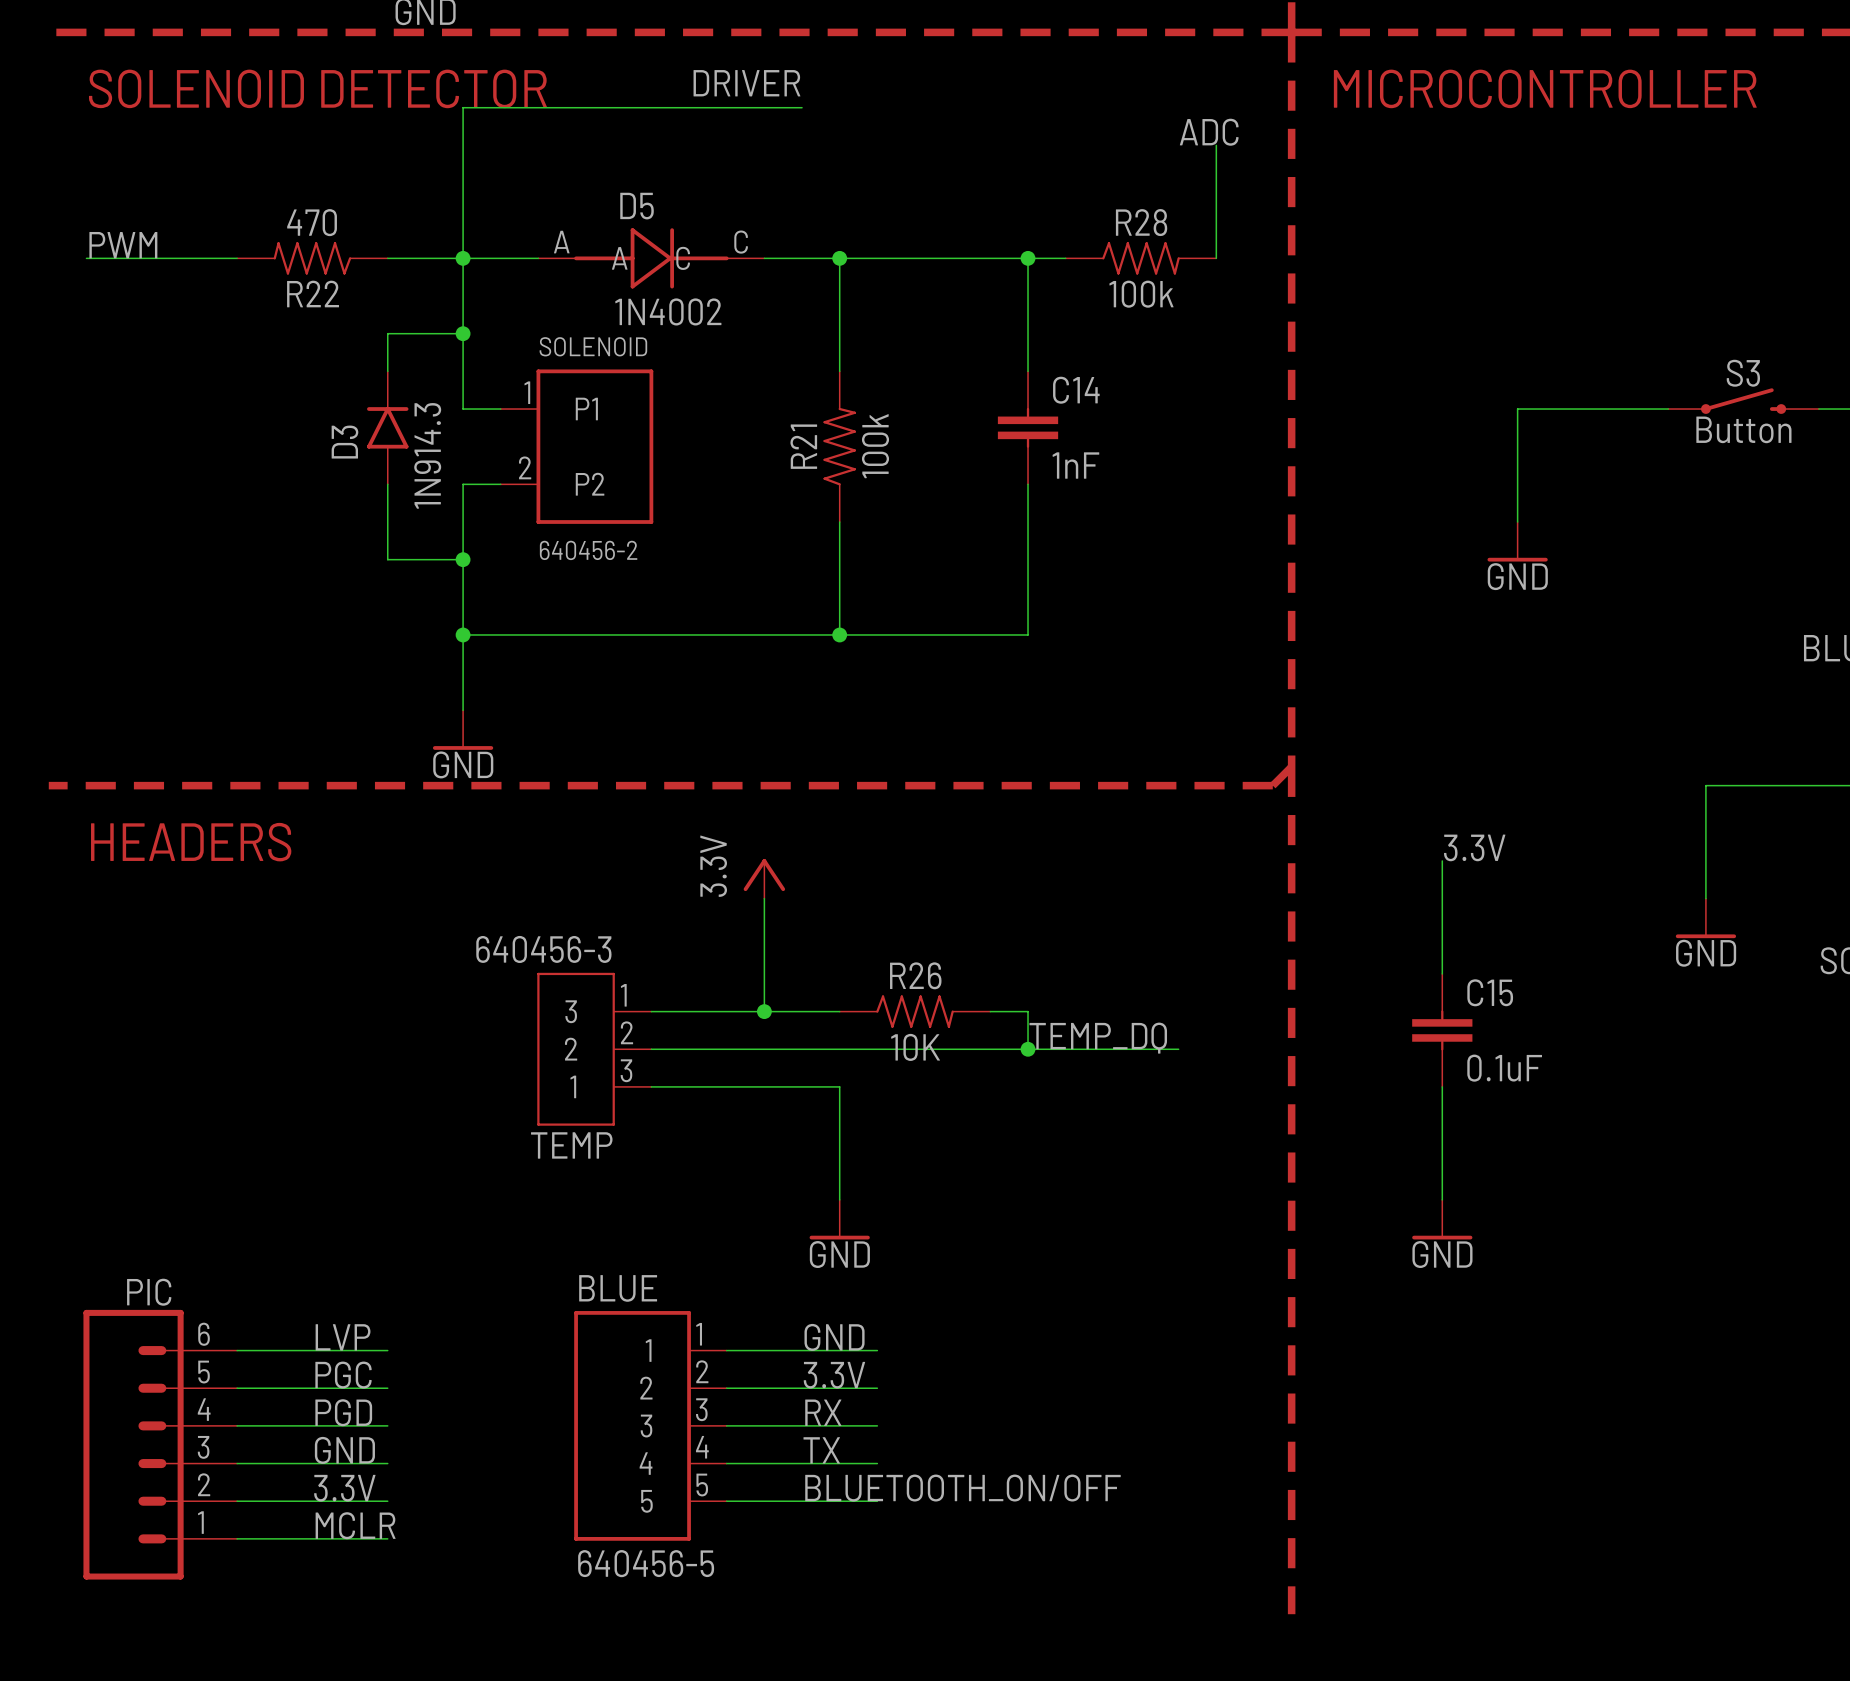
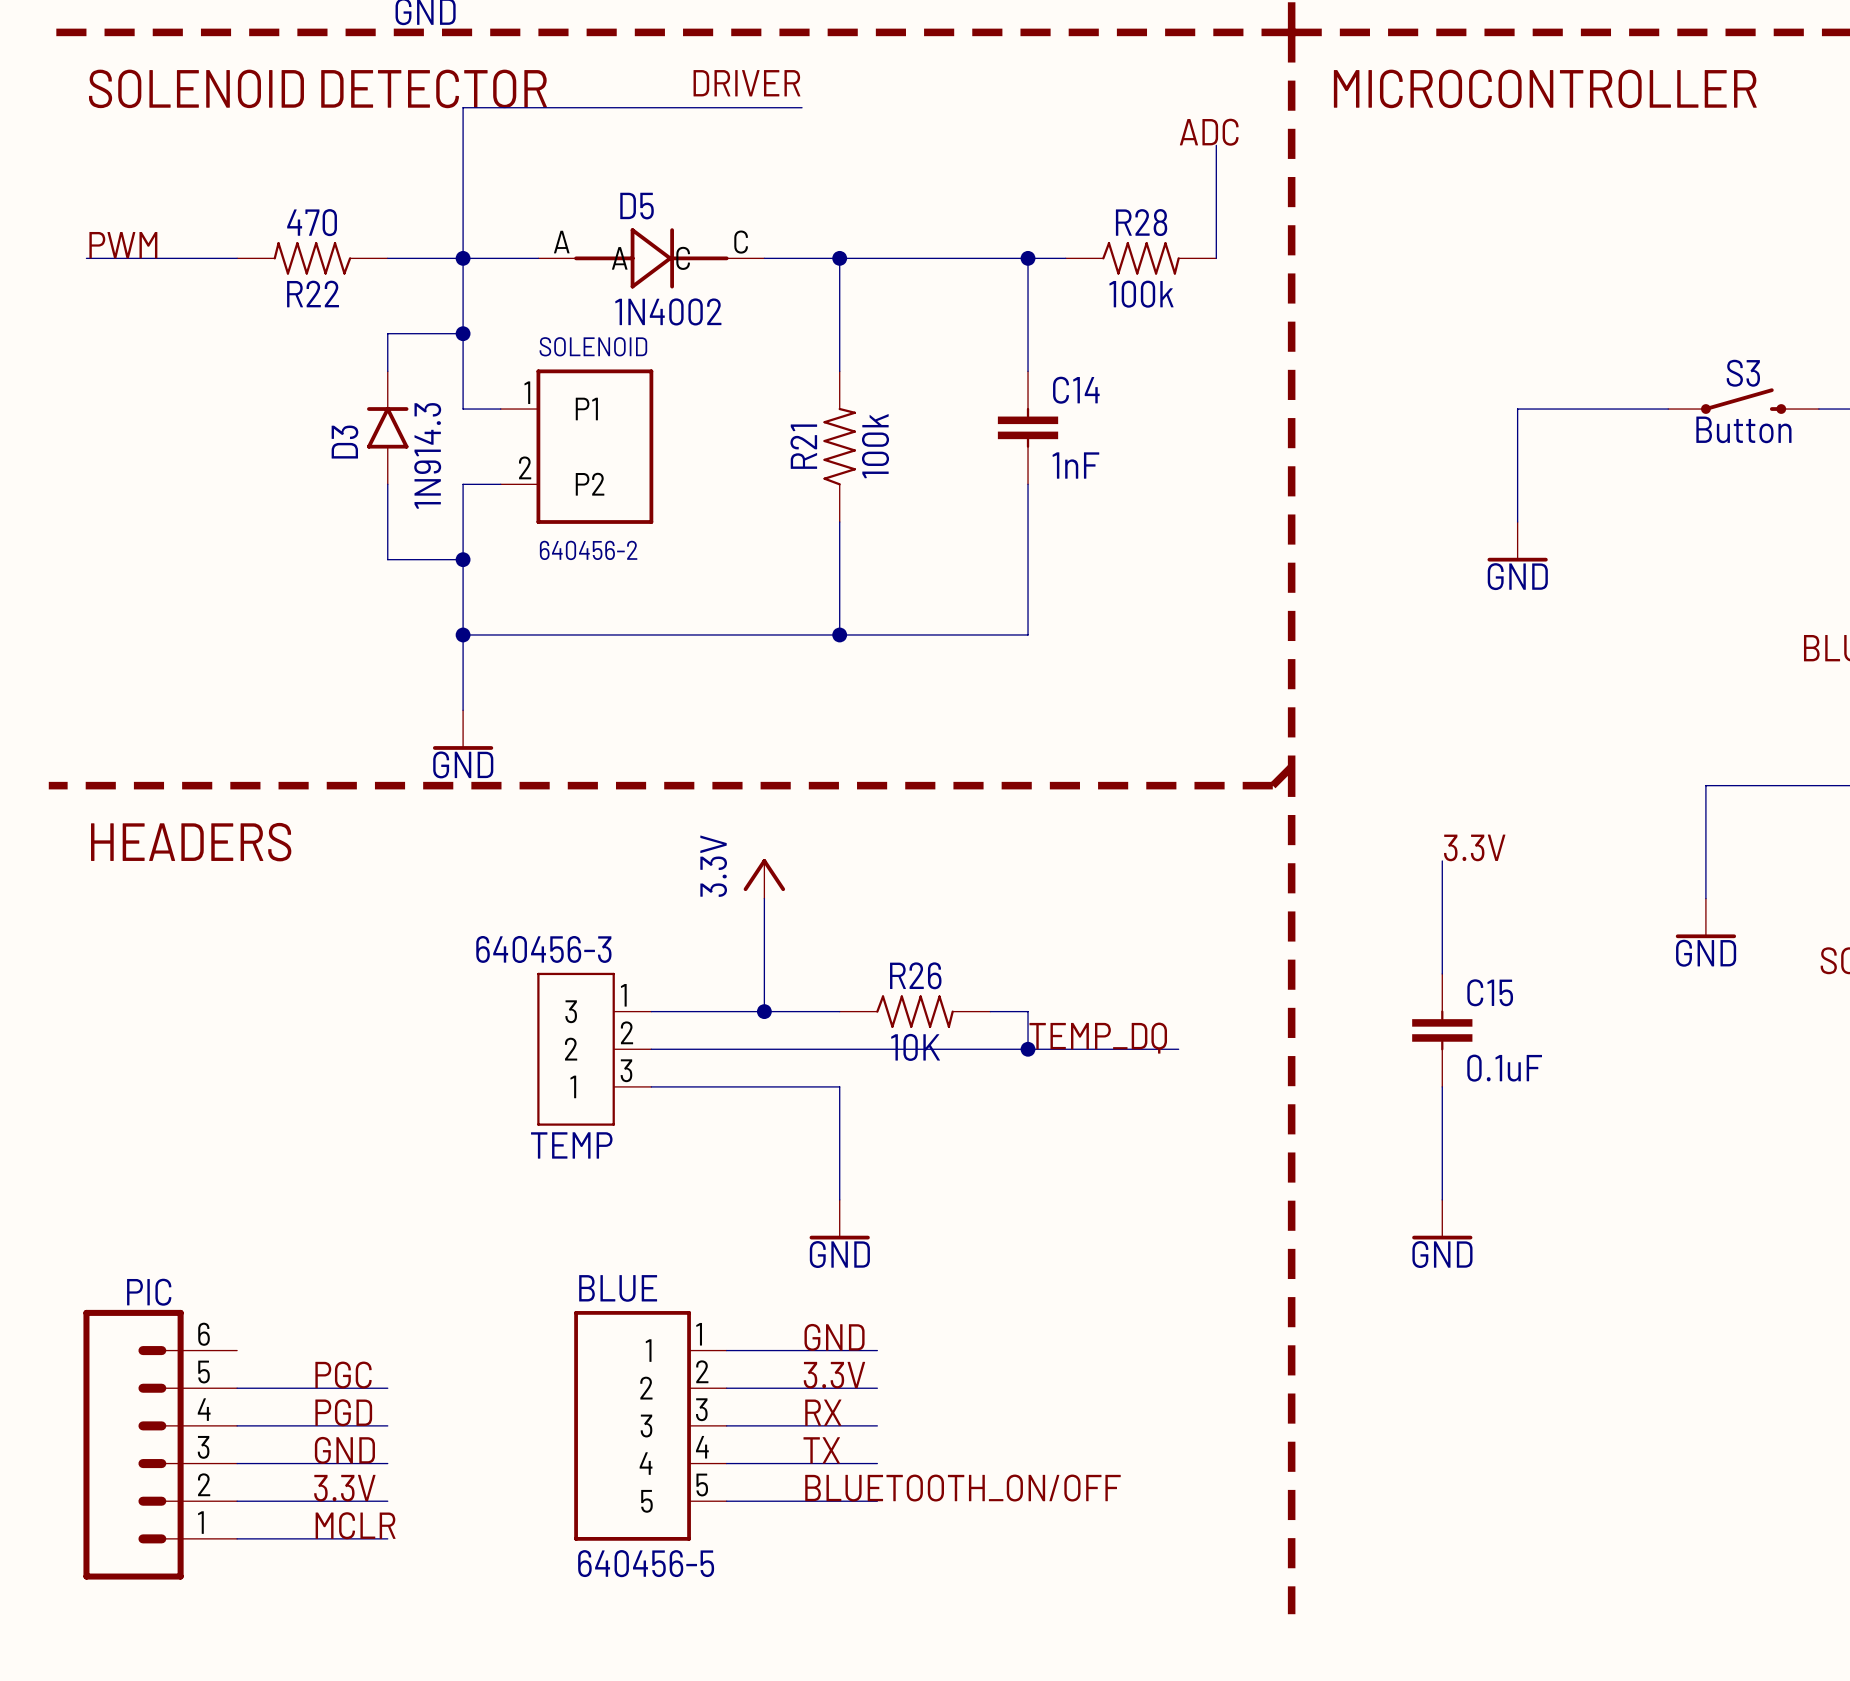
label: LVP (343, 1337) -> none
wire: (237, 1350) (387, 1350) -> none

